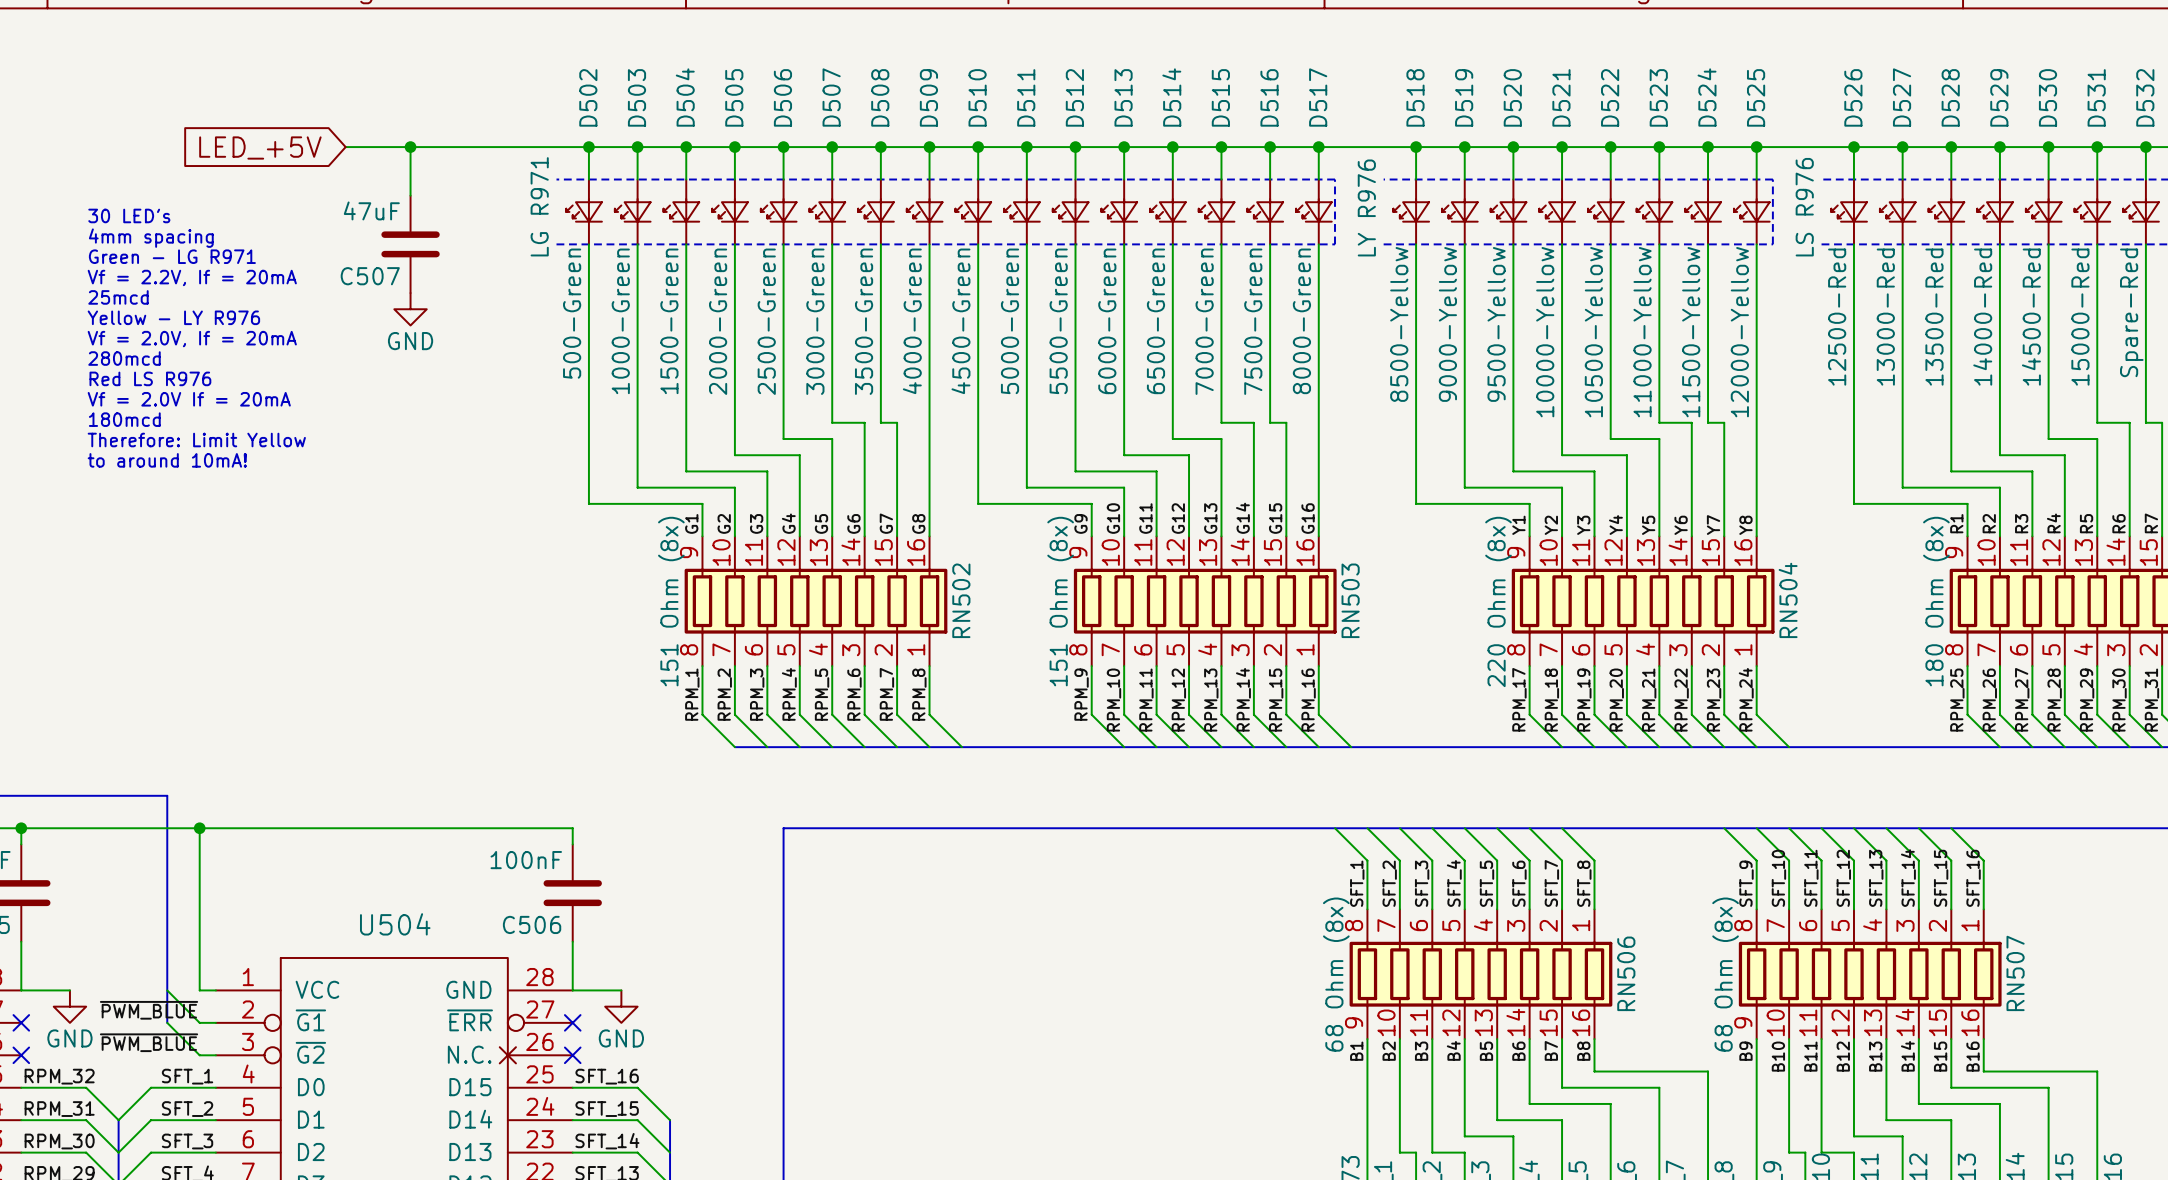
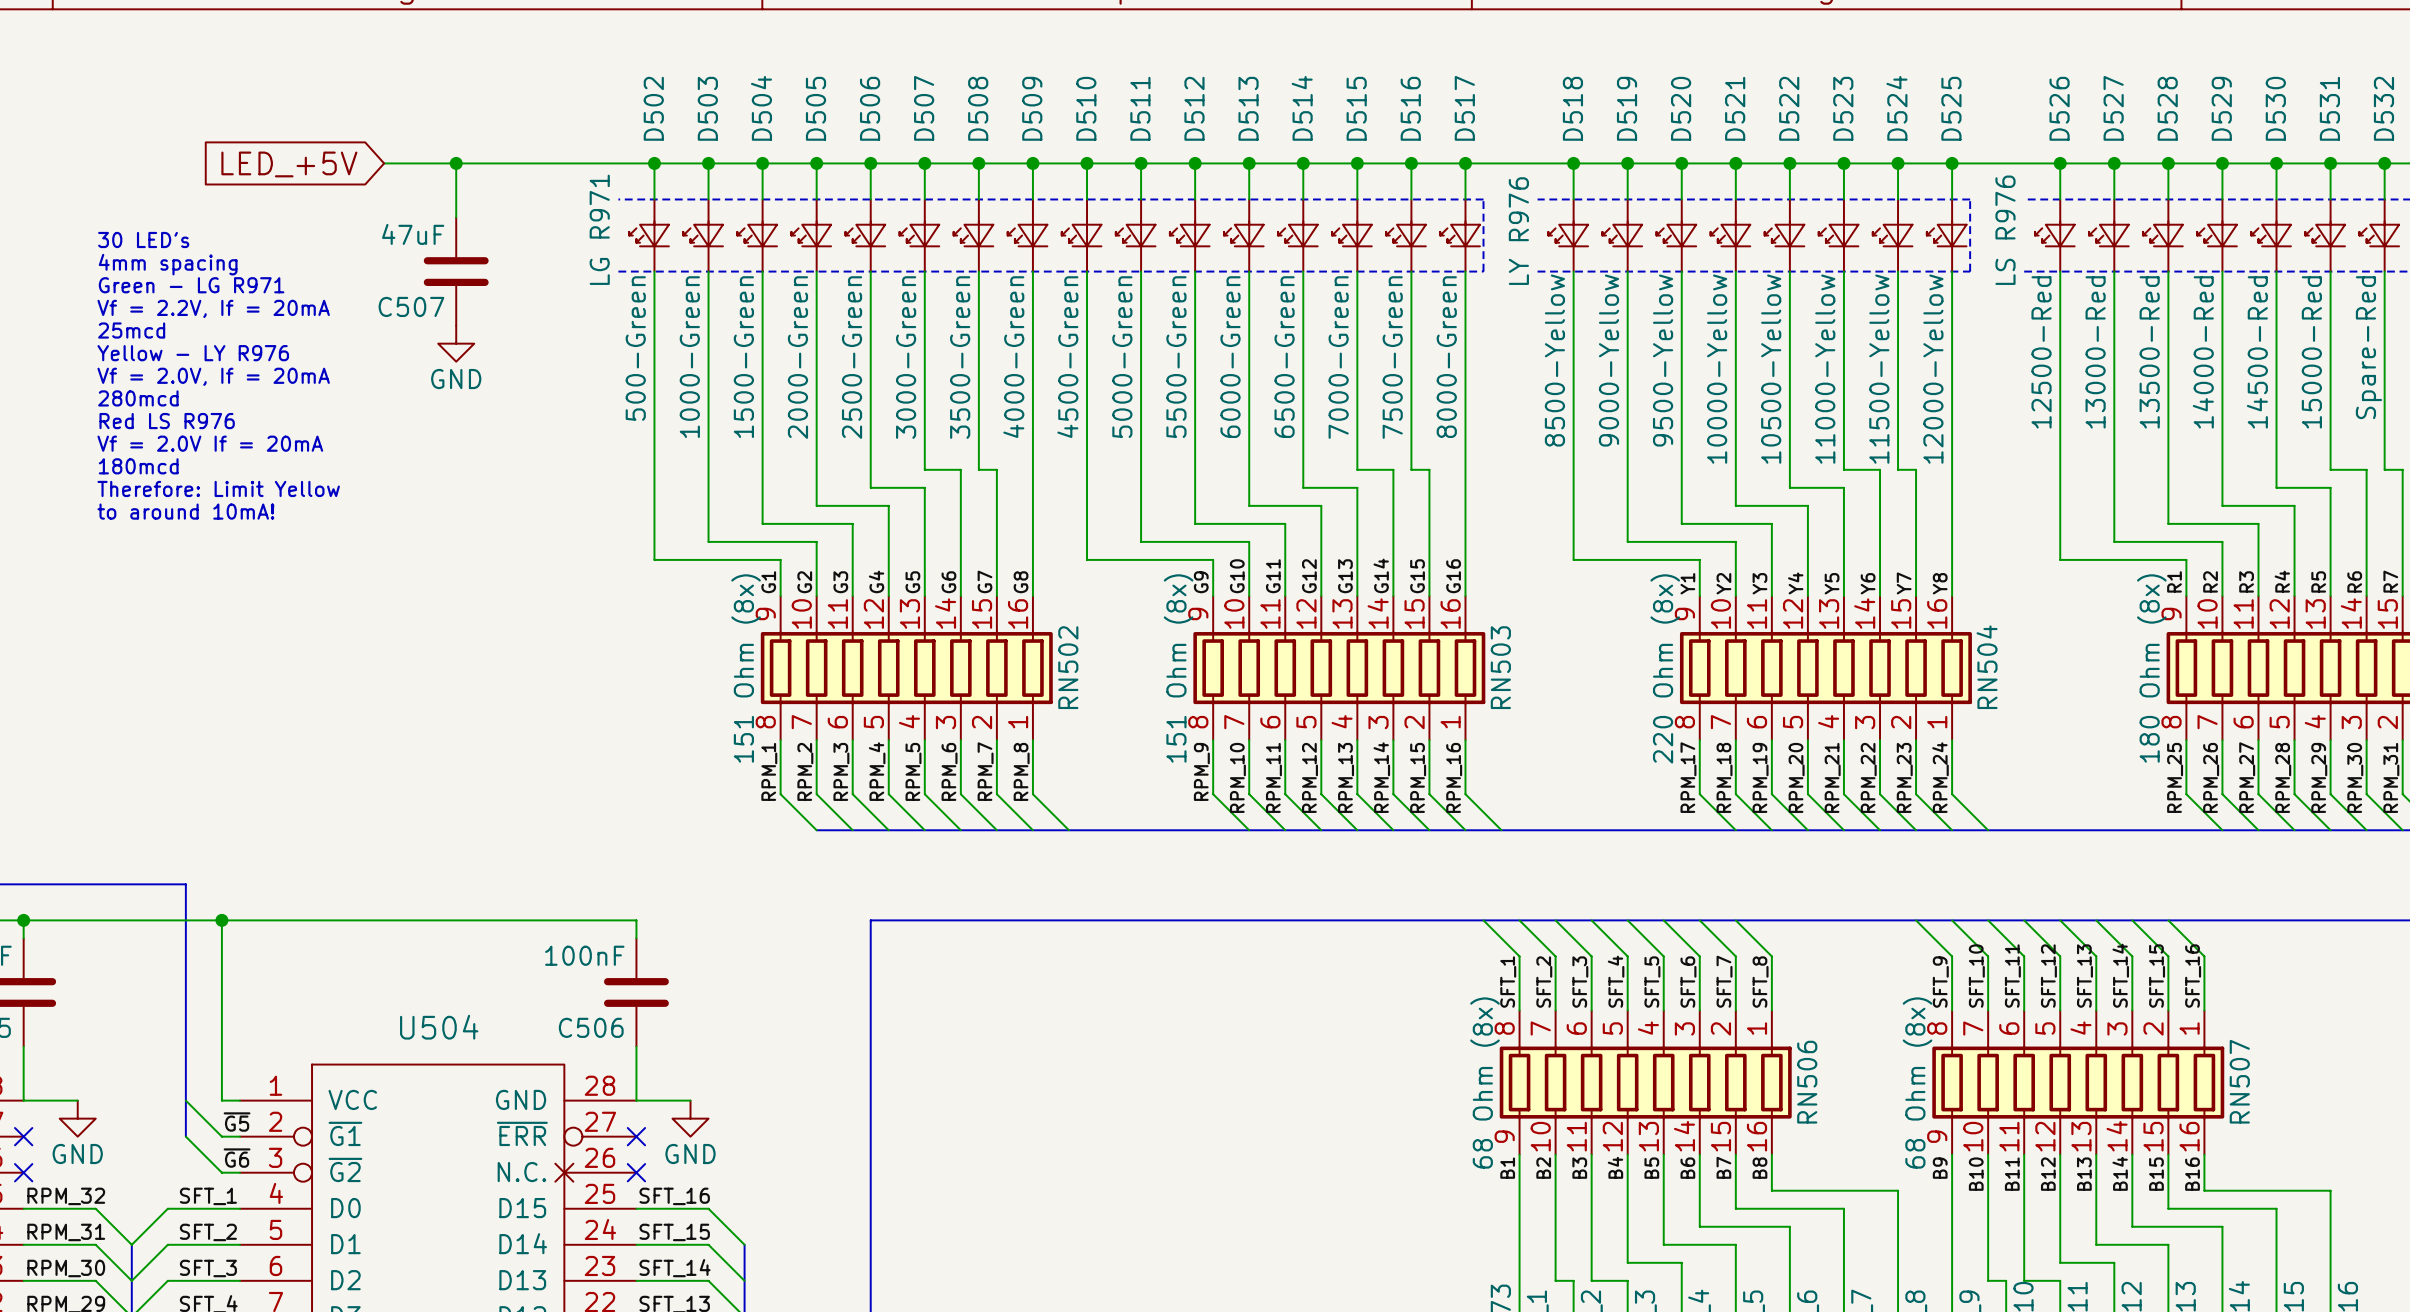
label: ~{PWM_BLUE} (149, 1010) -> ~{G5} (237, 1122)
label: ~{PWM_BLUE} (149, 1042) -> ~{G6} (237, 1158)

